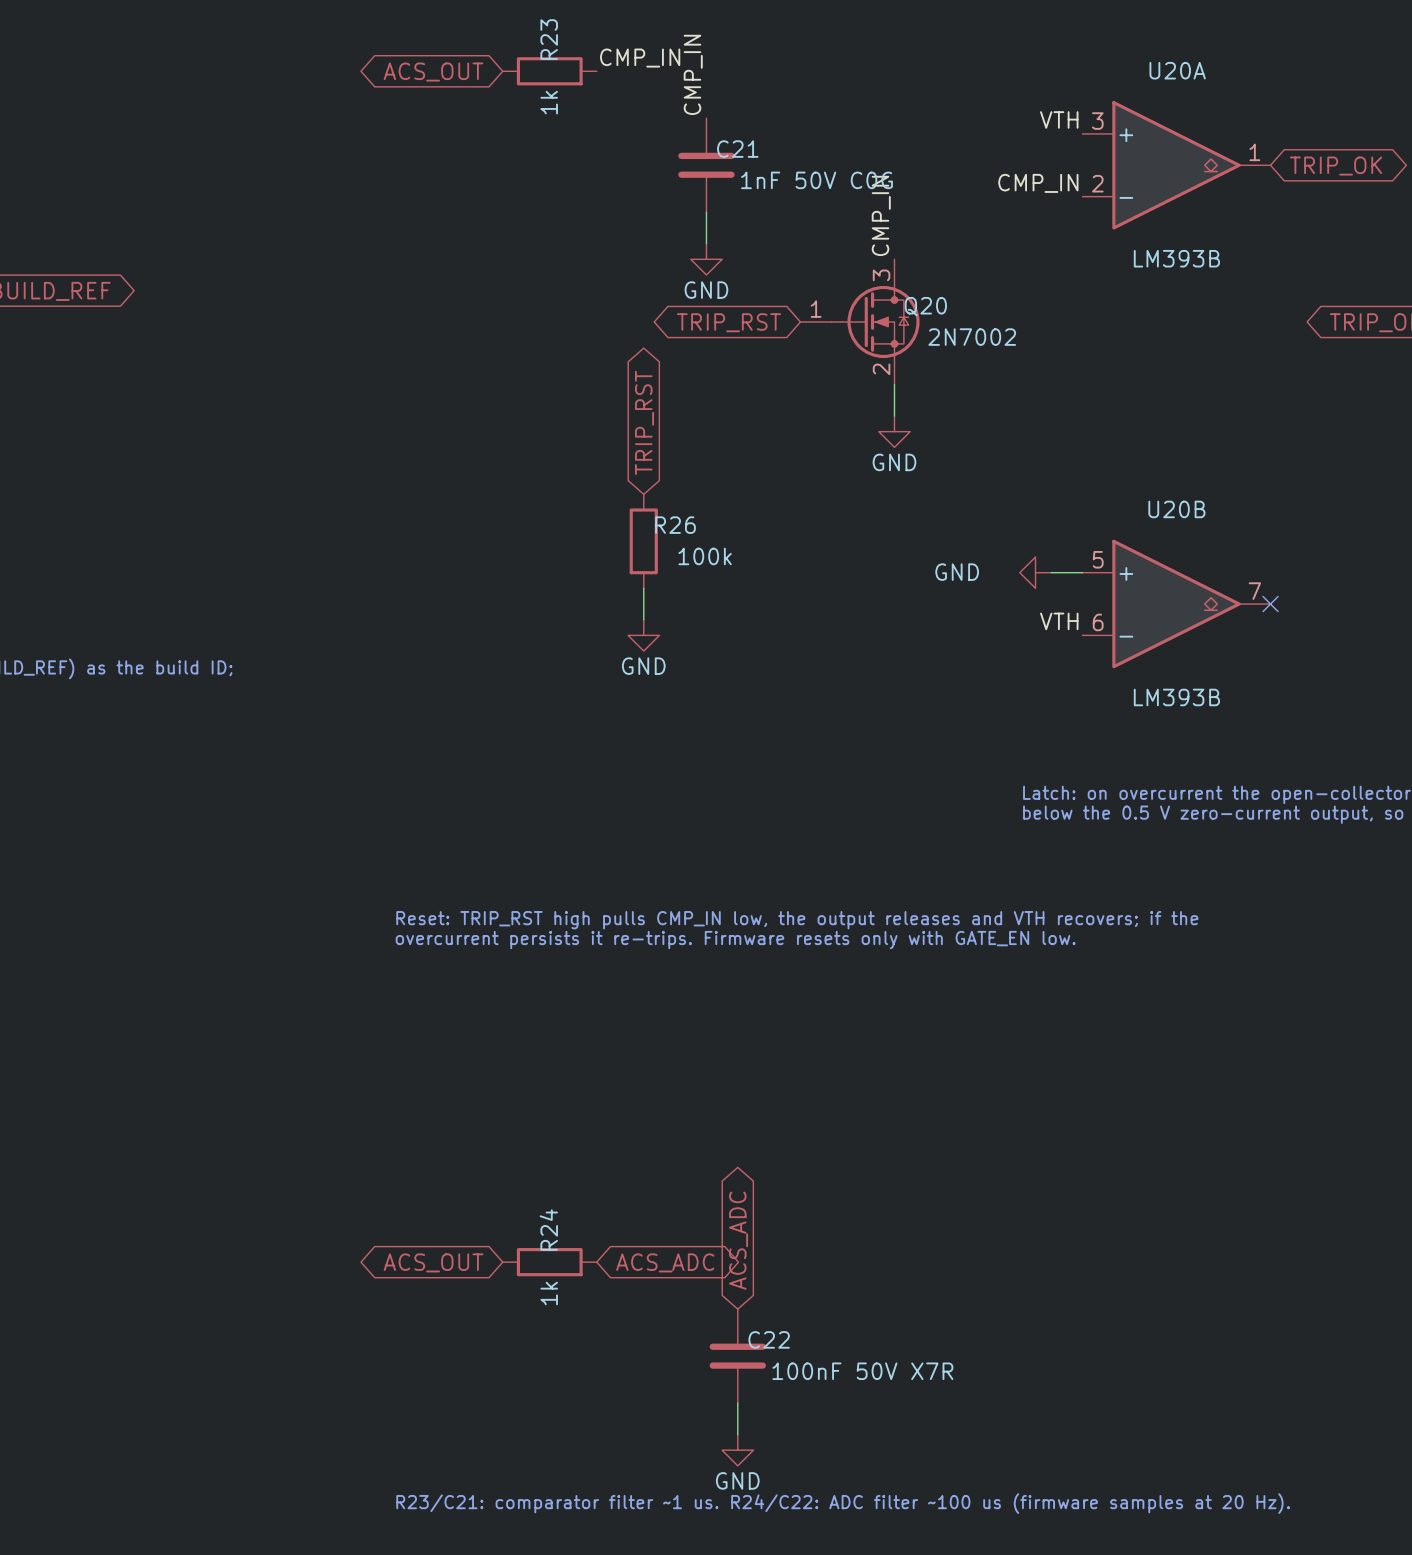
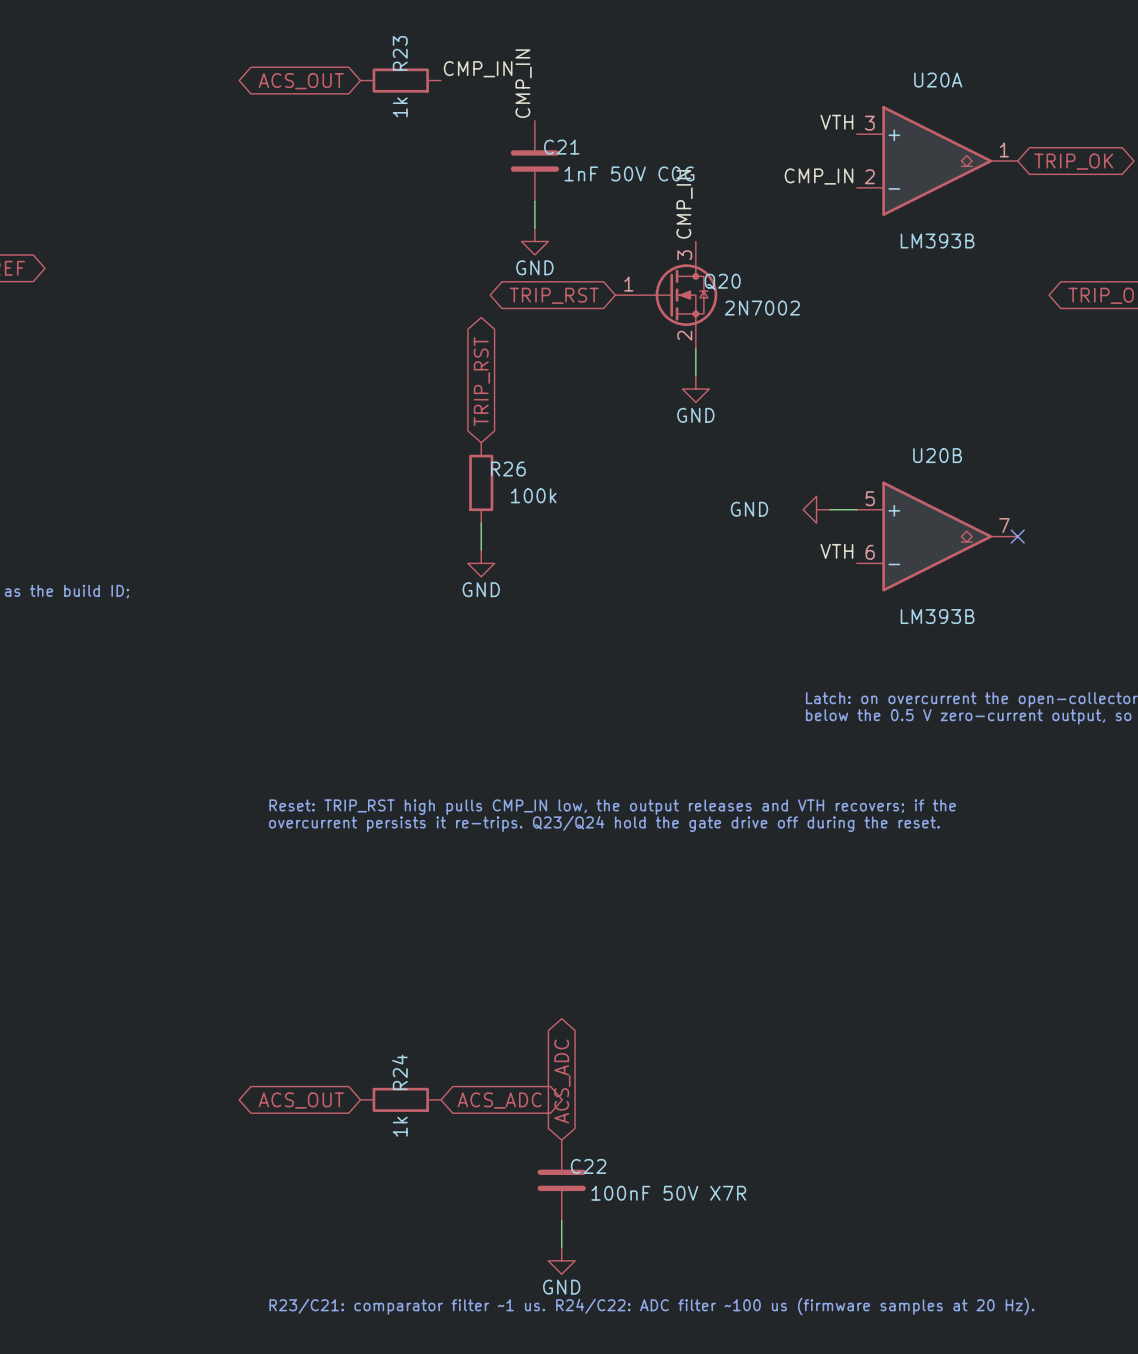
text: overcurrent persists it re-trips. Firmware resets only with GATE_EN low. (735, 940) -> overcurrent persists it re-trips. Q23/Q24 hold the gate drive off during the reset. (604, 823)

